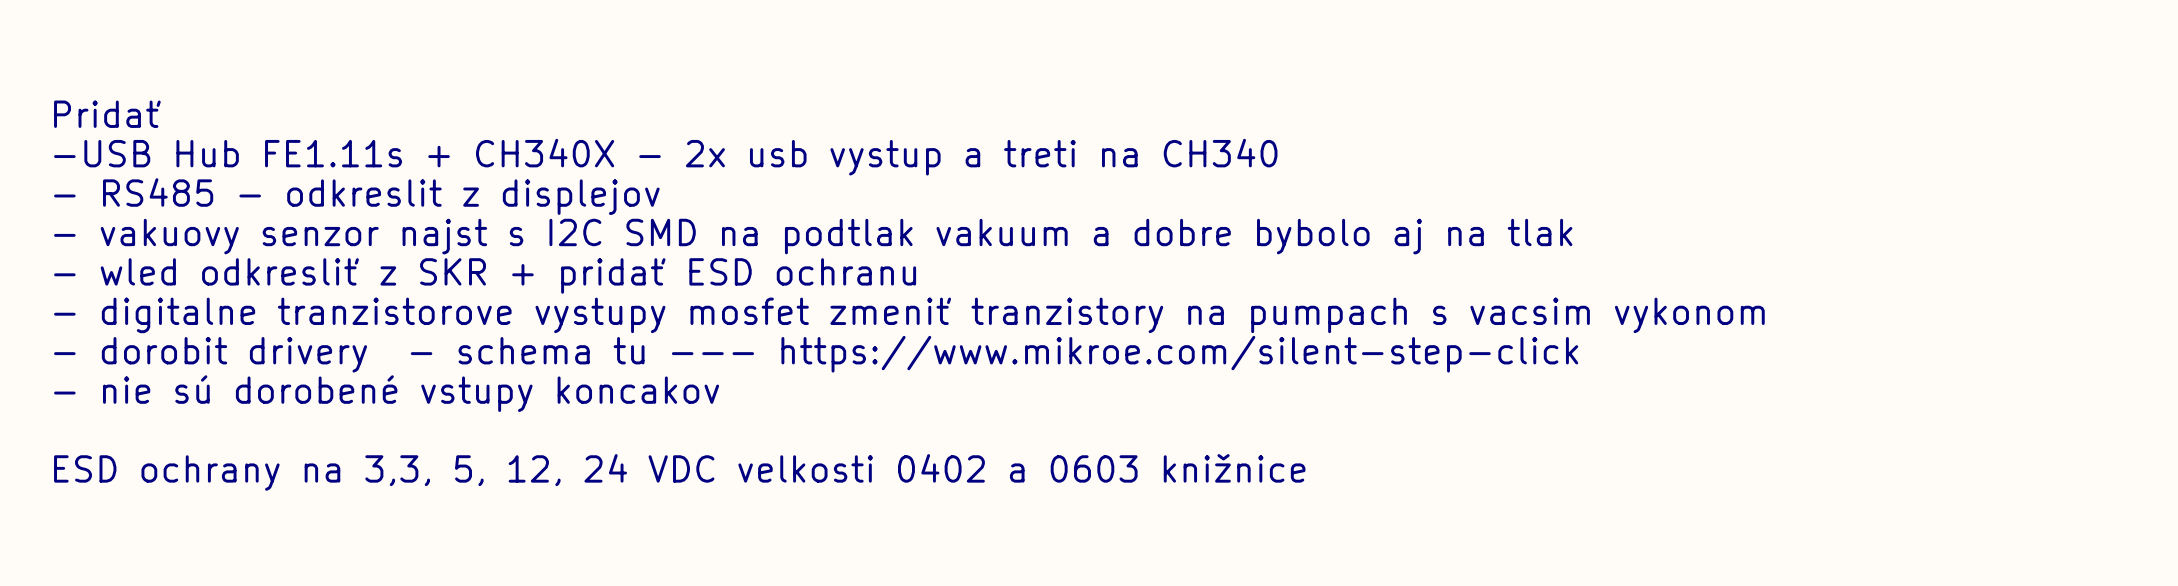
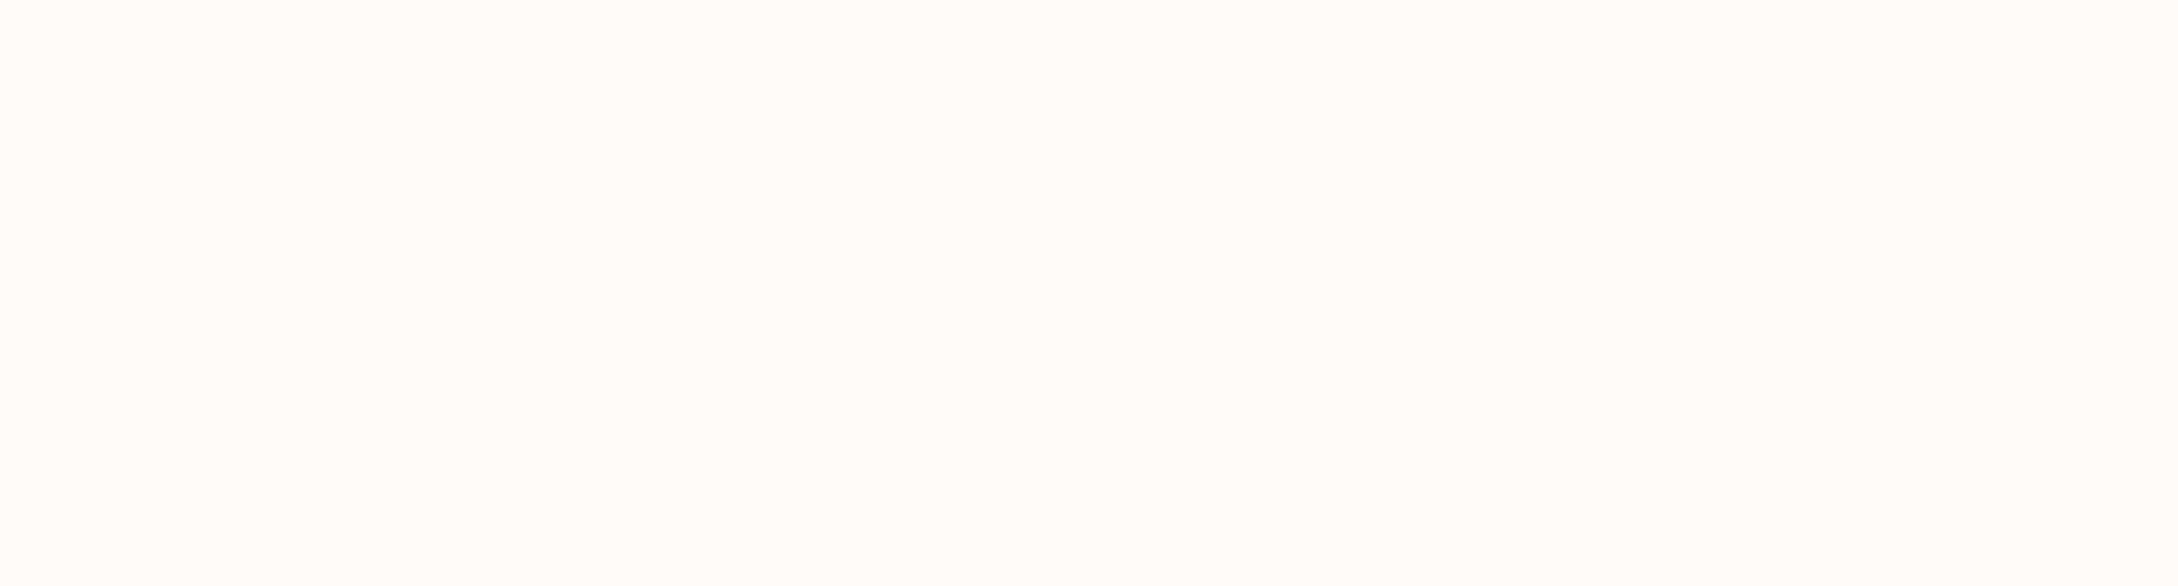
text: Pridať (107, 114) -> none
text: -USB Hub FE1.11s + CH340X - 2x usb vystup a treti na CH340 (665, 157) -> none
text: - RS485 - odkreslit z displejov (356, 196) -> none
text: - vakuovy senzor najst s I2C SMD na podtlak vakuum a dobre bybolo aj na tlak (813, 236) -> none
text: - wled odkresliť z SKR + pridať ESD ochranu (485, 275) -> none
text: - digitalne tranzistorove vystupy mosfet zmeniť tranzistory na pumpach s vacsim vykonom (909, 315) -> none
text: - dorobit drivery - schema tu --- https://www.mikroe.com/silent-step-click (816, 354) -> none
text: - nie sú dorobené vstupy koncakov (386, 393) -> none
text: ESD ochrany na 3,3, 5, 12, 24 VDC velkosti 0402 a 0603 knižnice (679, 472) -> none

